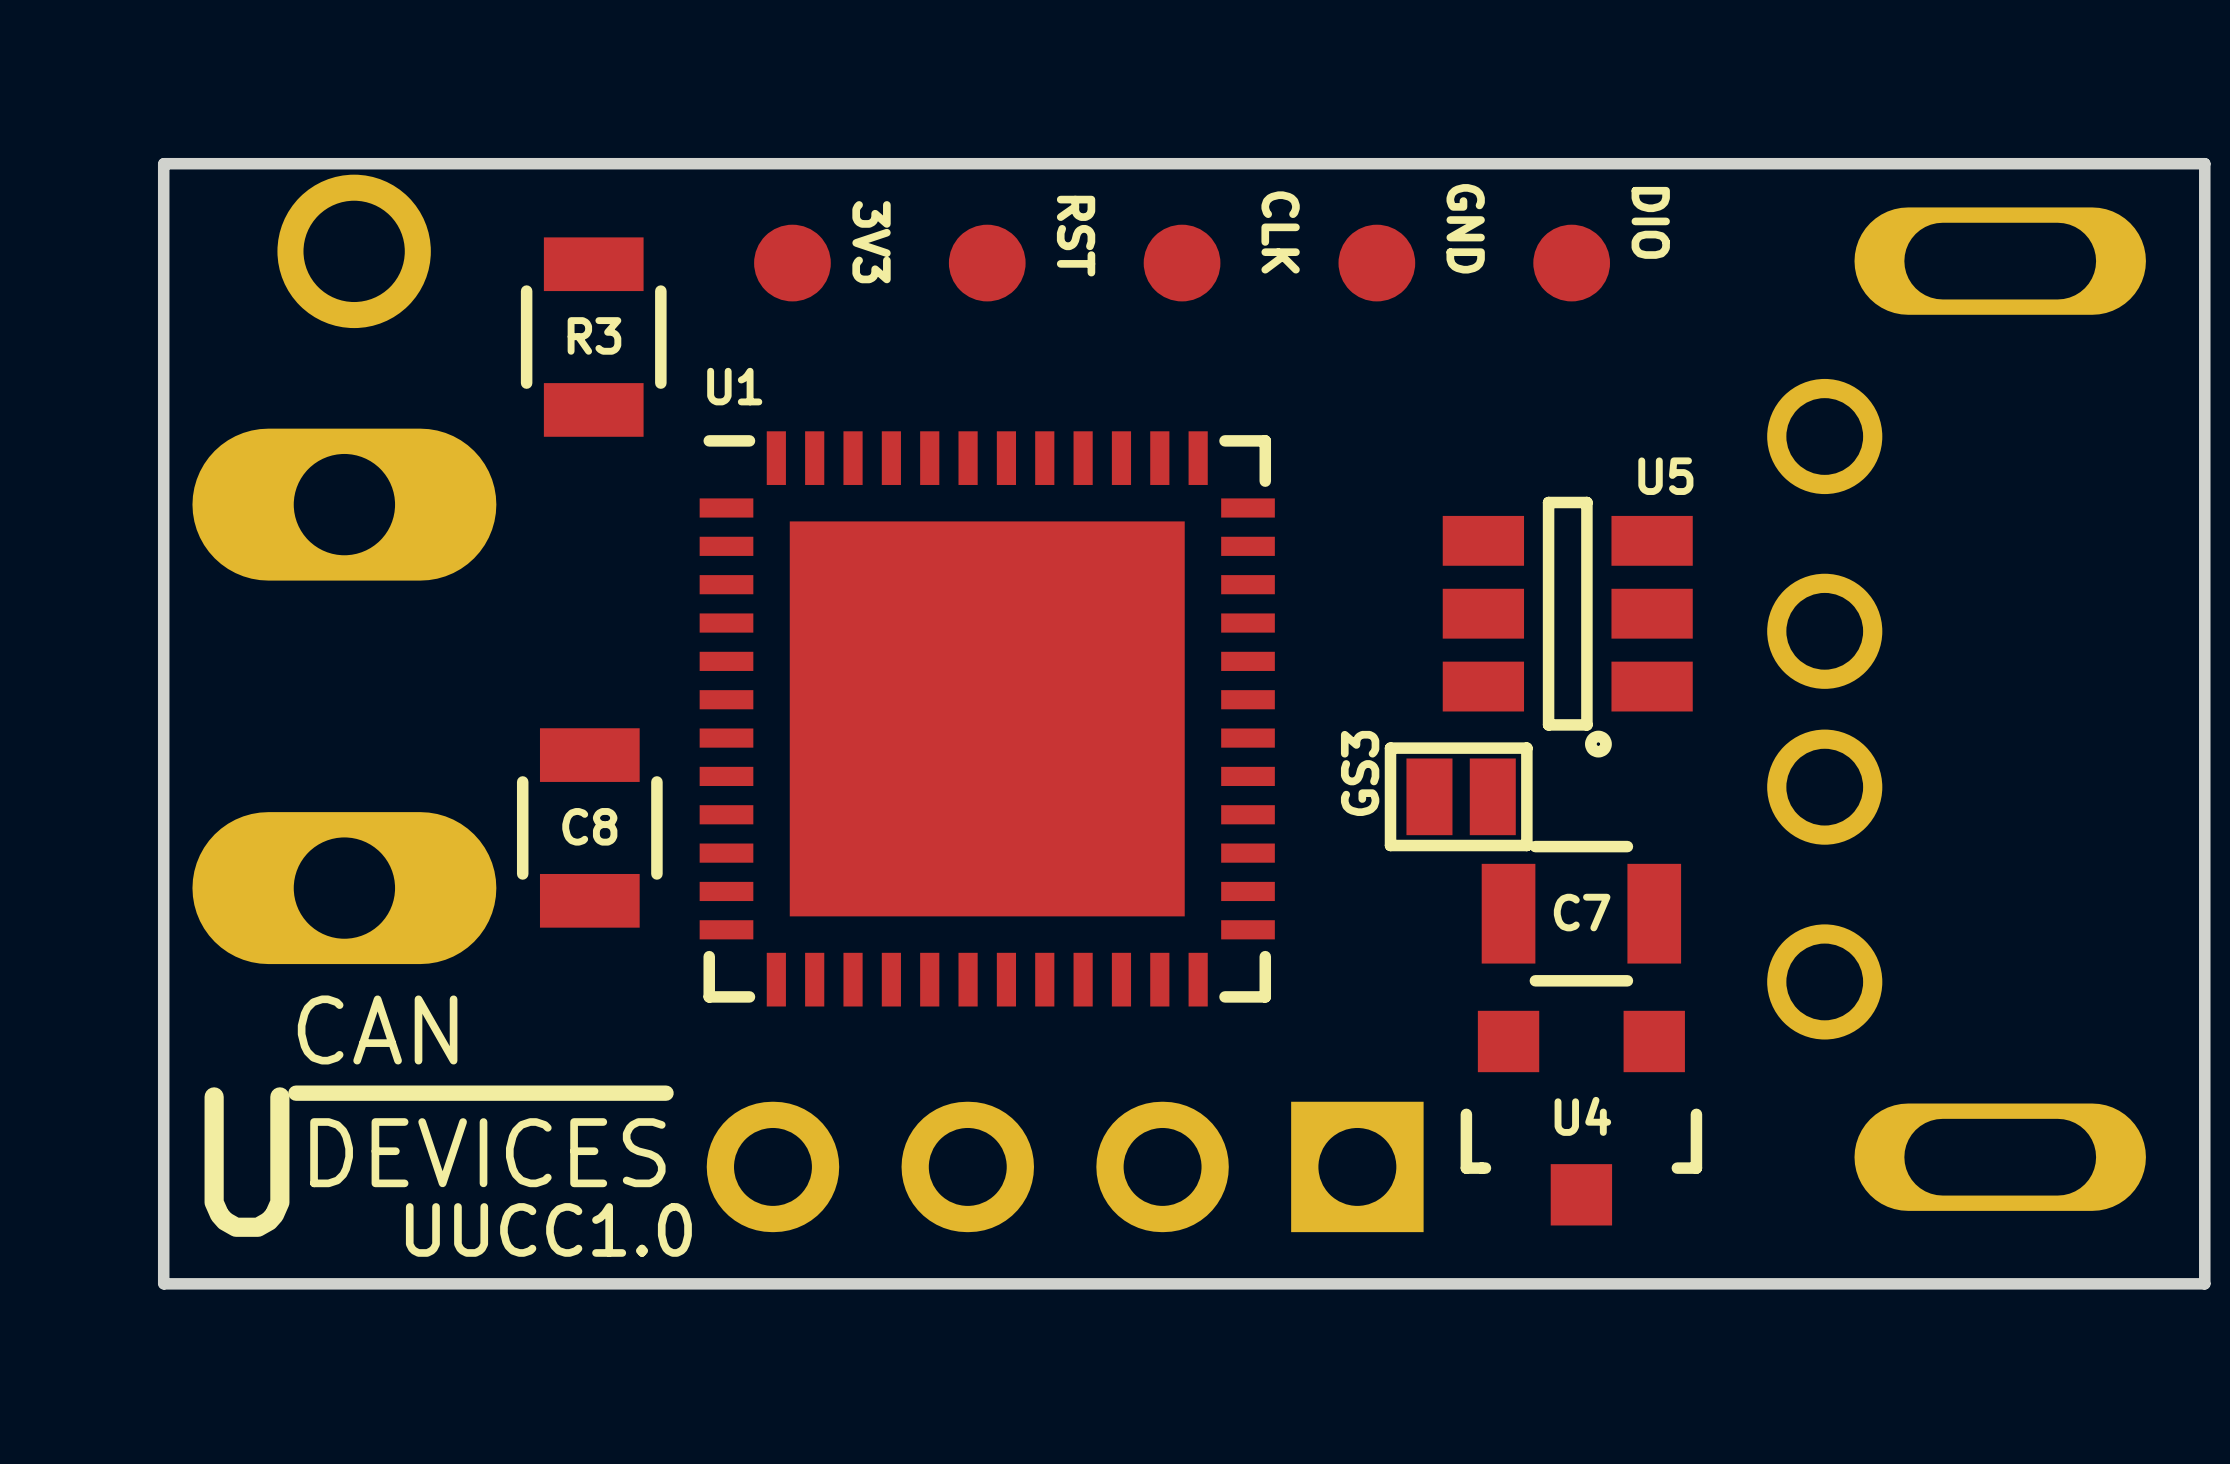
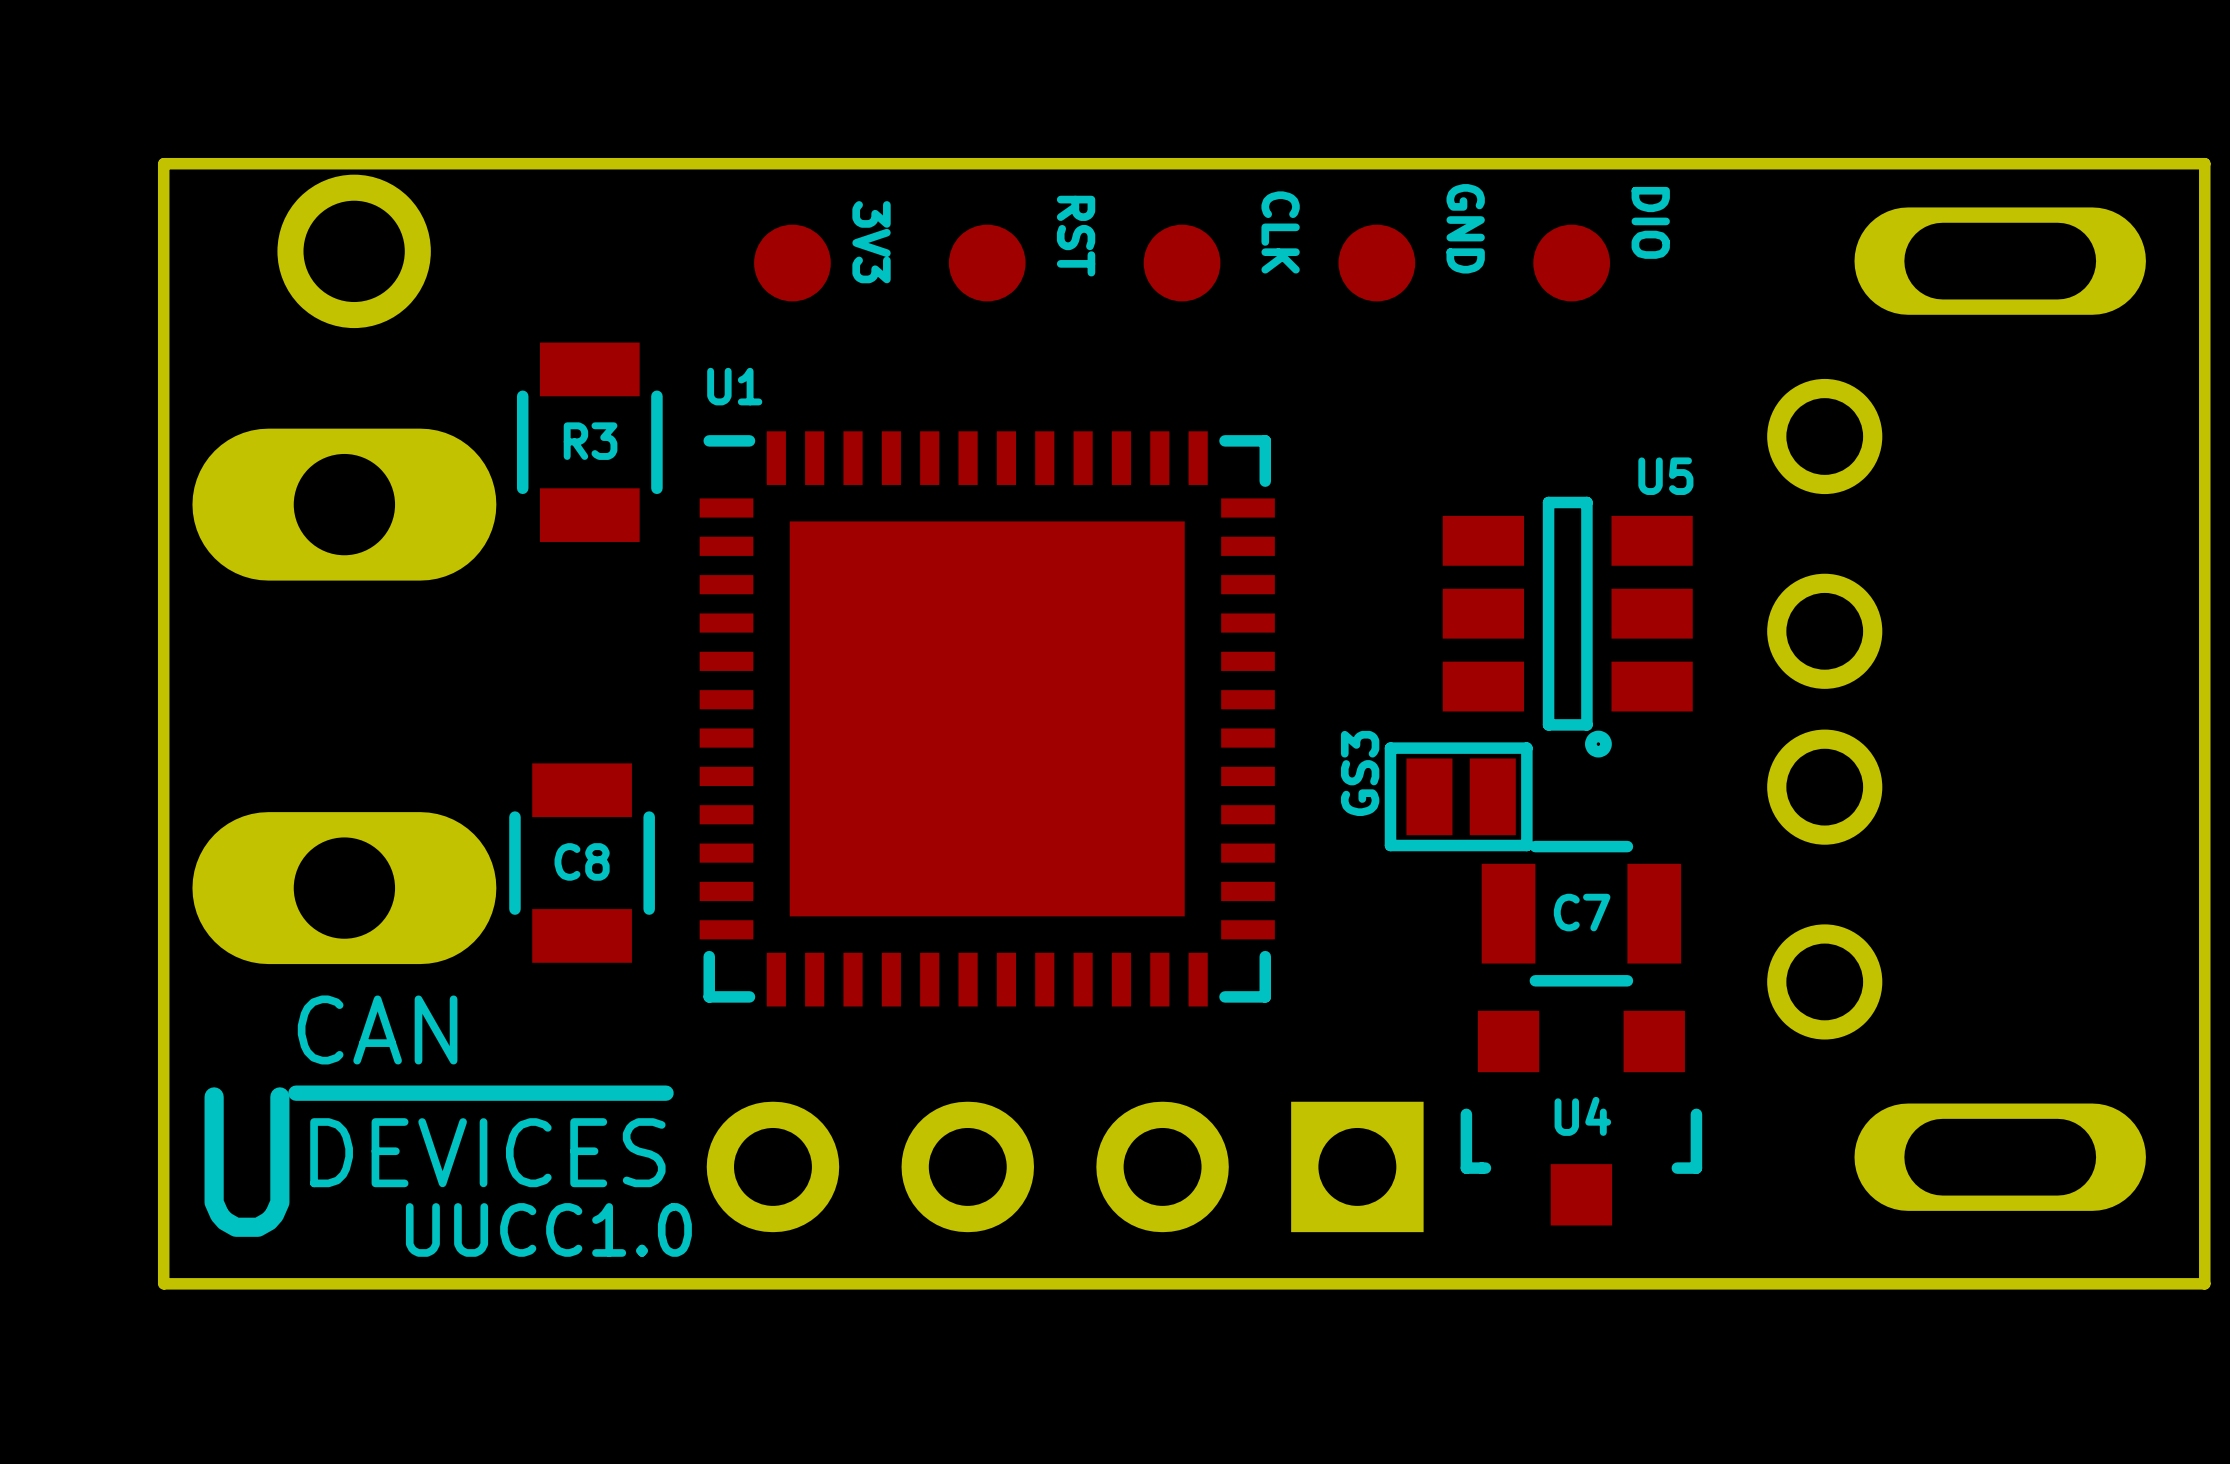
R3 position: (593, 337) -> (589, 442)
C8 position: (589, 827) -> (582, 863)

